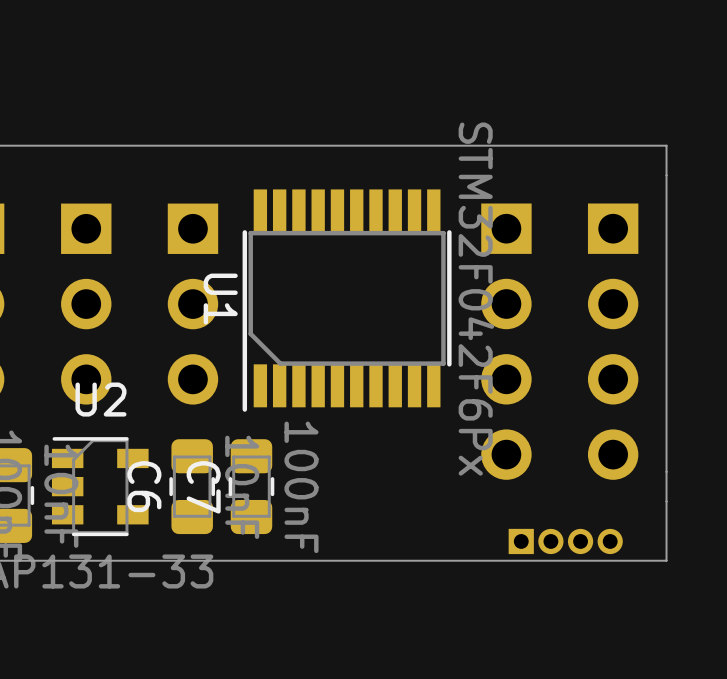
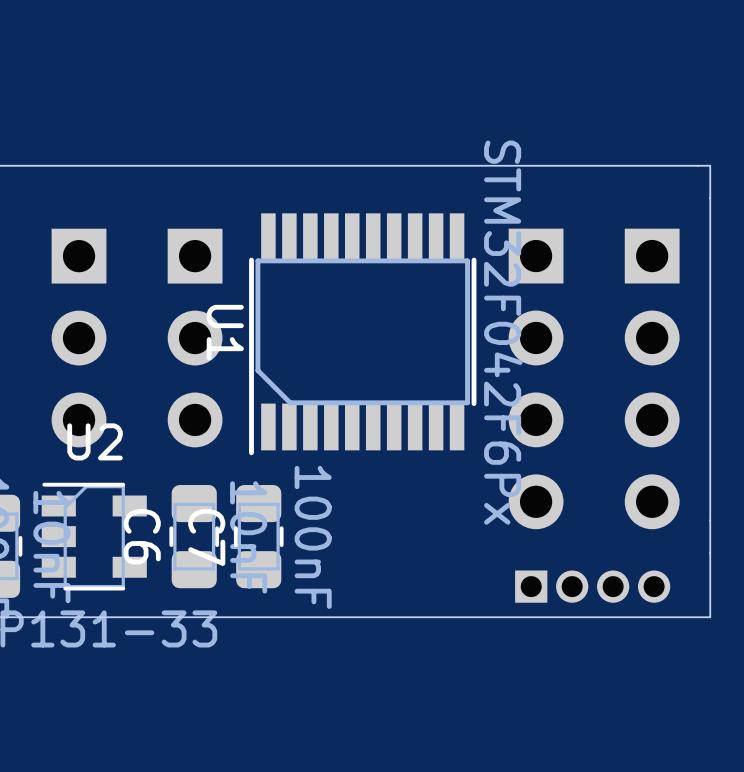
part footprint: [508, 528, 623, 555] -> [515, 570, 671, 603]

